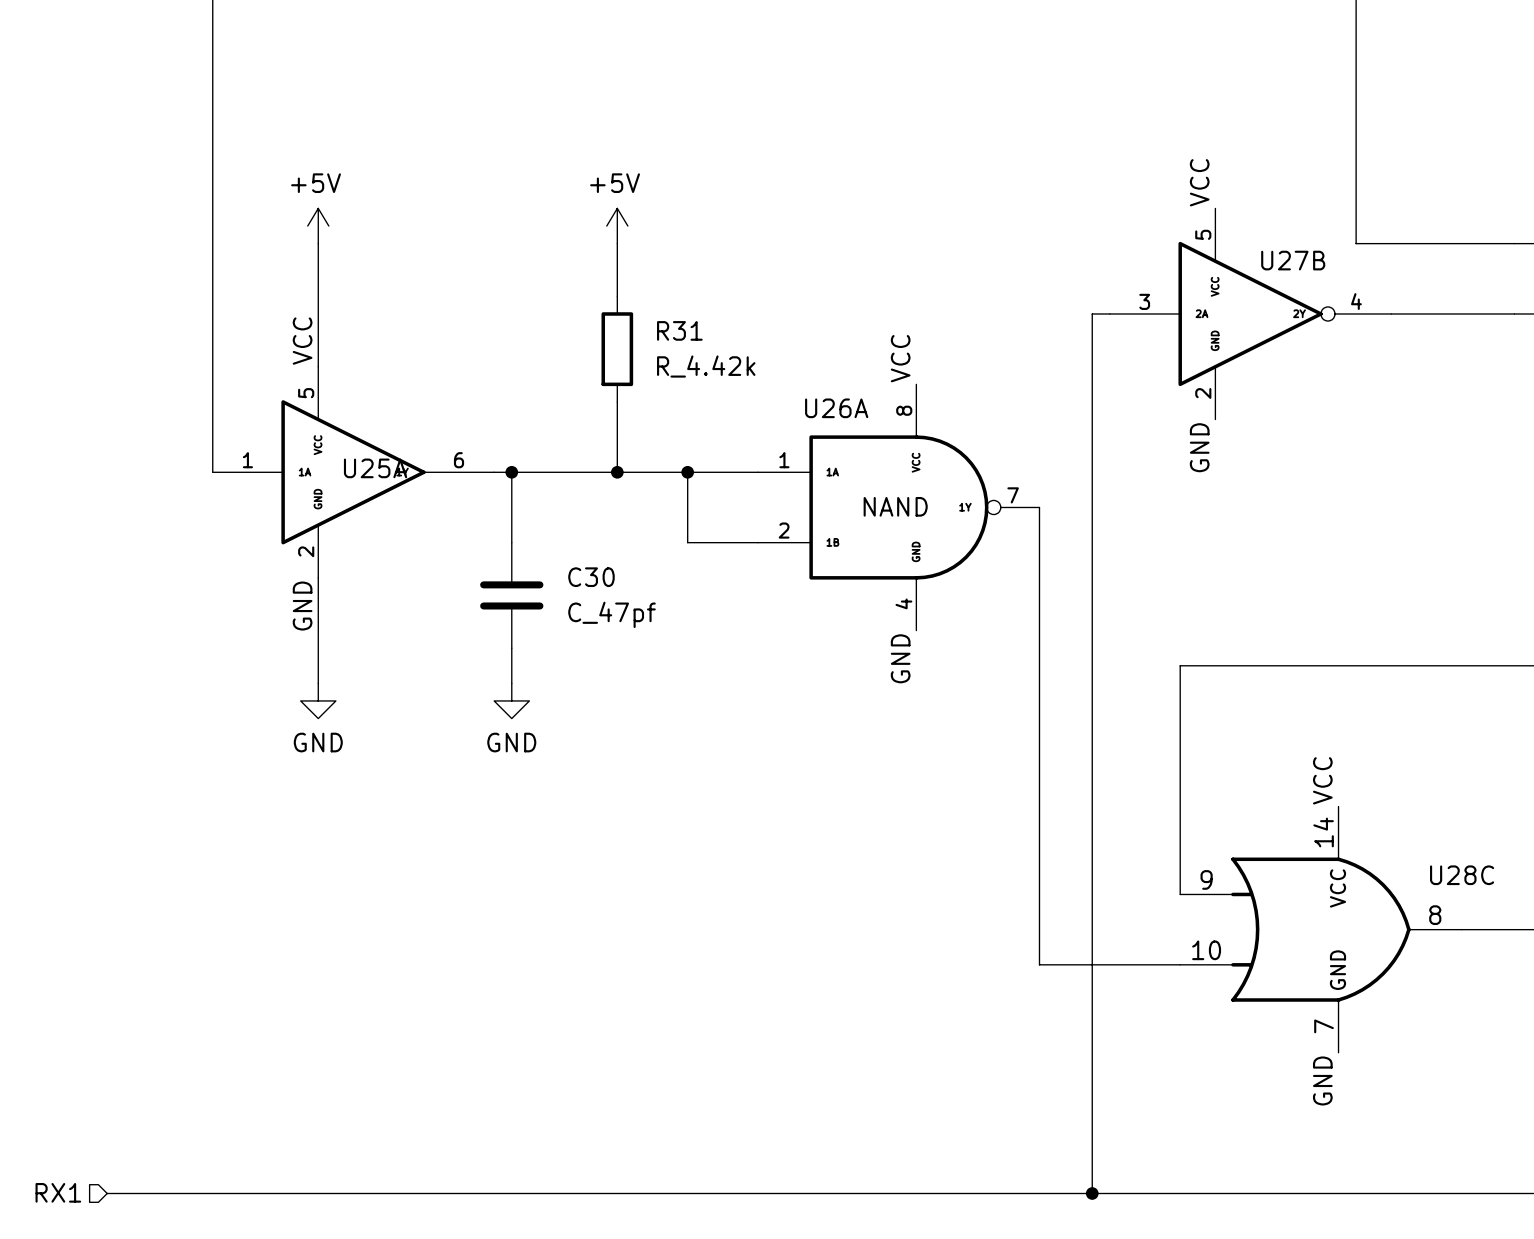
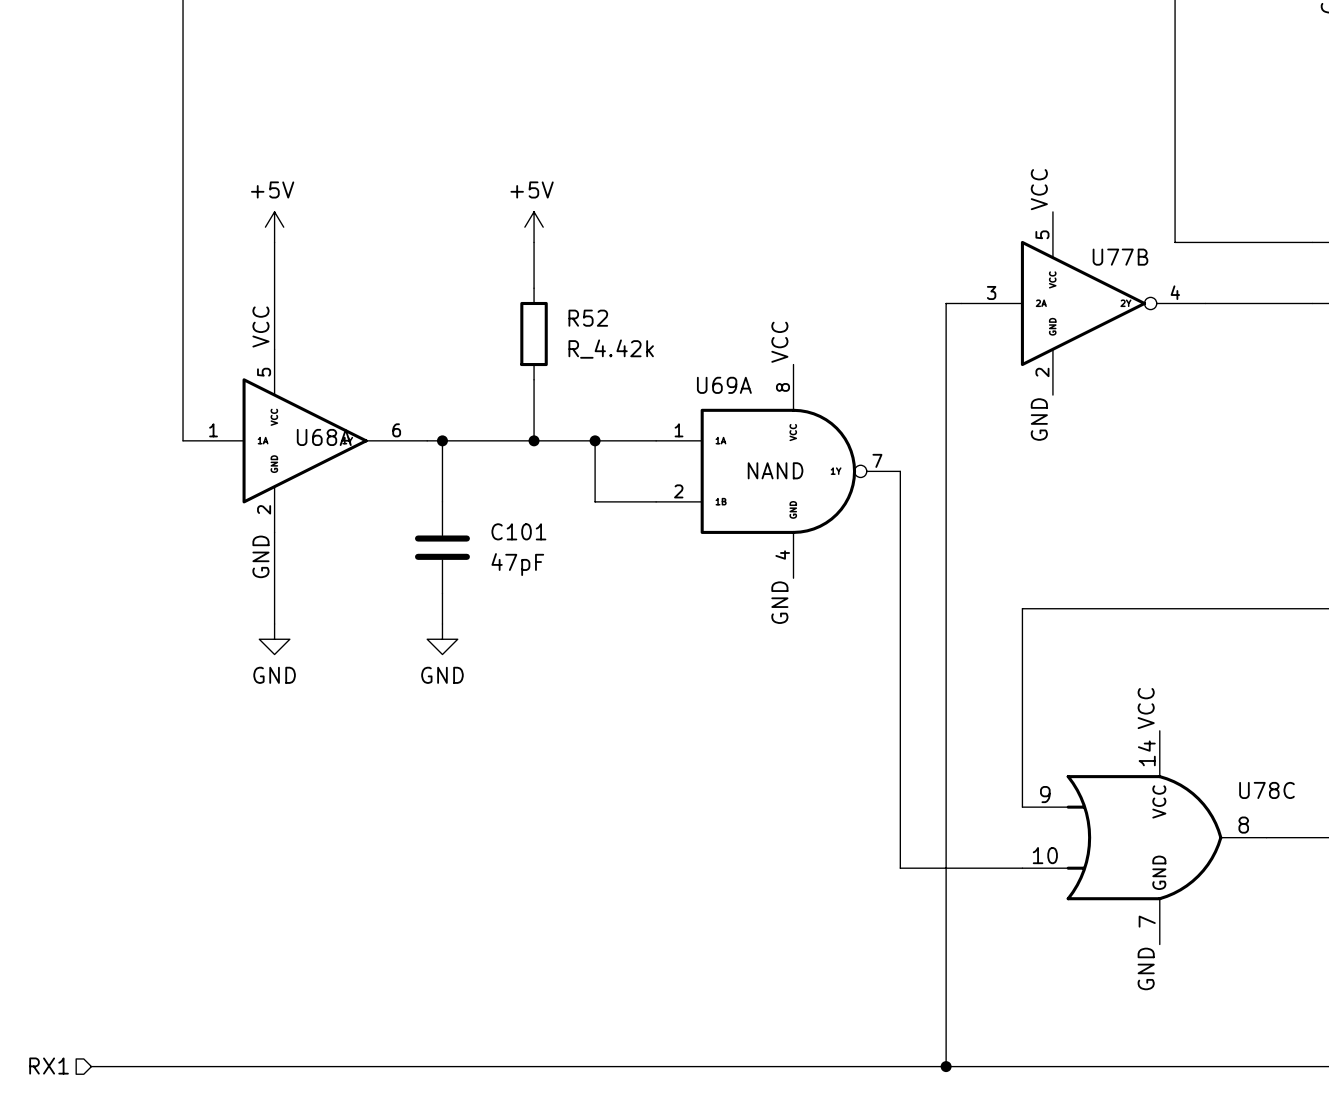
U27B name: U27B (1293, 260) -> U77B (1120, 257)
R31 name: R31 (679, 330) -> R52 (588, 318)
U26A name: U26A (836, 408) -> U69A (724, 385)
U25A name: U25A (375, 468) -> U68A (324, 437)
C30 name: C30 (591, 577) -> C101 (518, 531)
C30 value: C_47pf (612, 614) -> 47pF (517, 564)
U28C name: U28C (1462, 875) -> U78C (1266, 790)

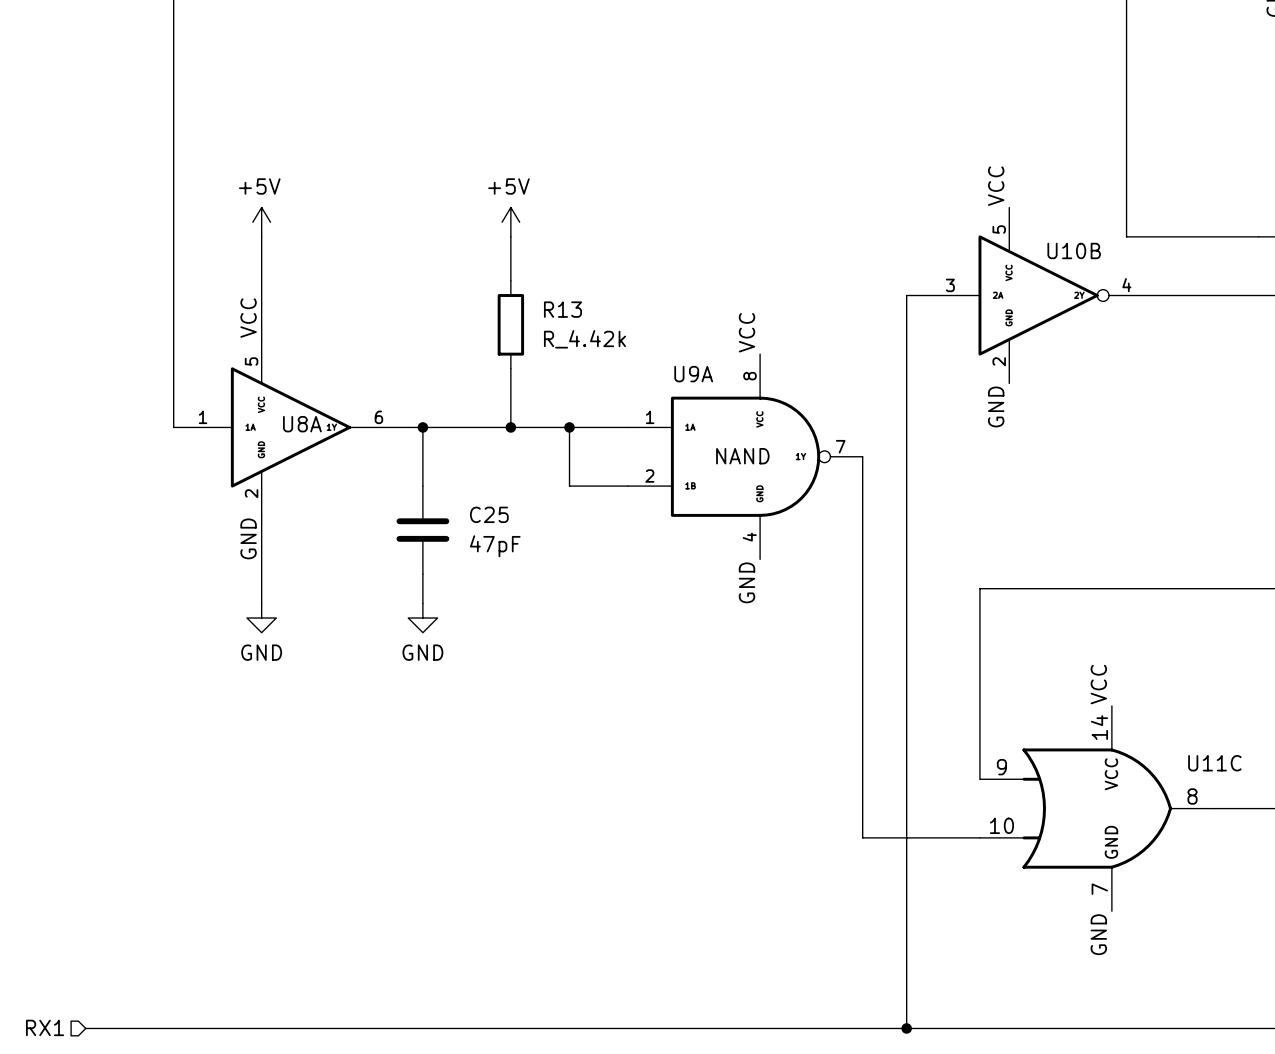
U77B name: U77B (1120, 257) -> U10B (1074, 250)
R52 name: R52 (588, 318) -> R13 (562, 309)
U69A name: U69A (724, 385) -> U9A (693, 374)
U68A name: U68A (324, 437) -> U8A (302, 424)
C101 name: C101 (518, 531) -> C25 (489, 514)
U78C name: U78C (1266, 790) -> U11C (1214, 763)

